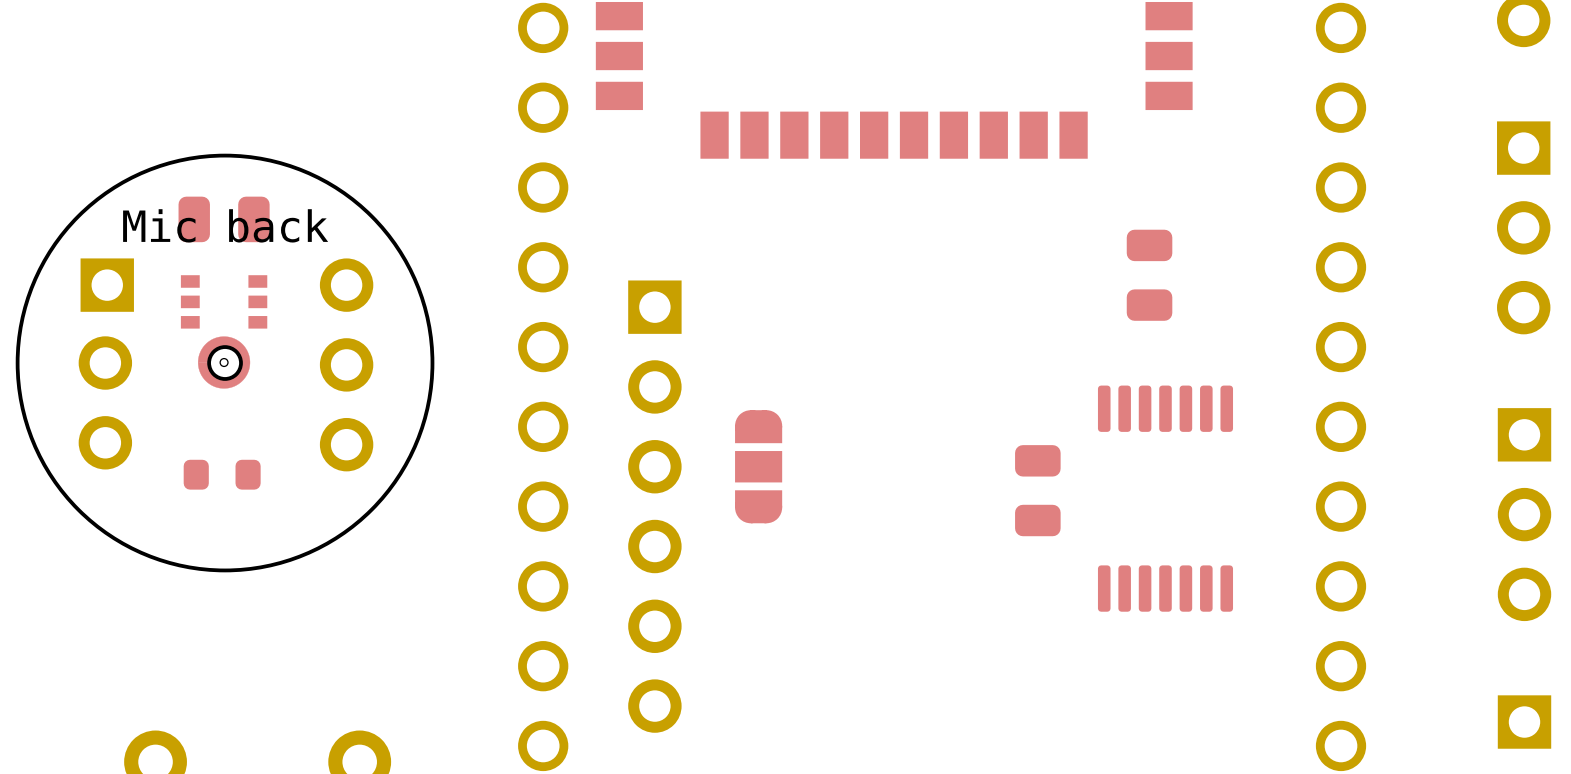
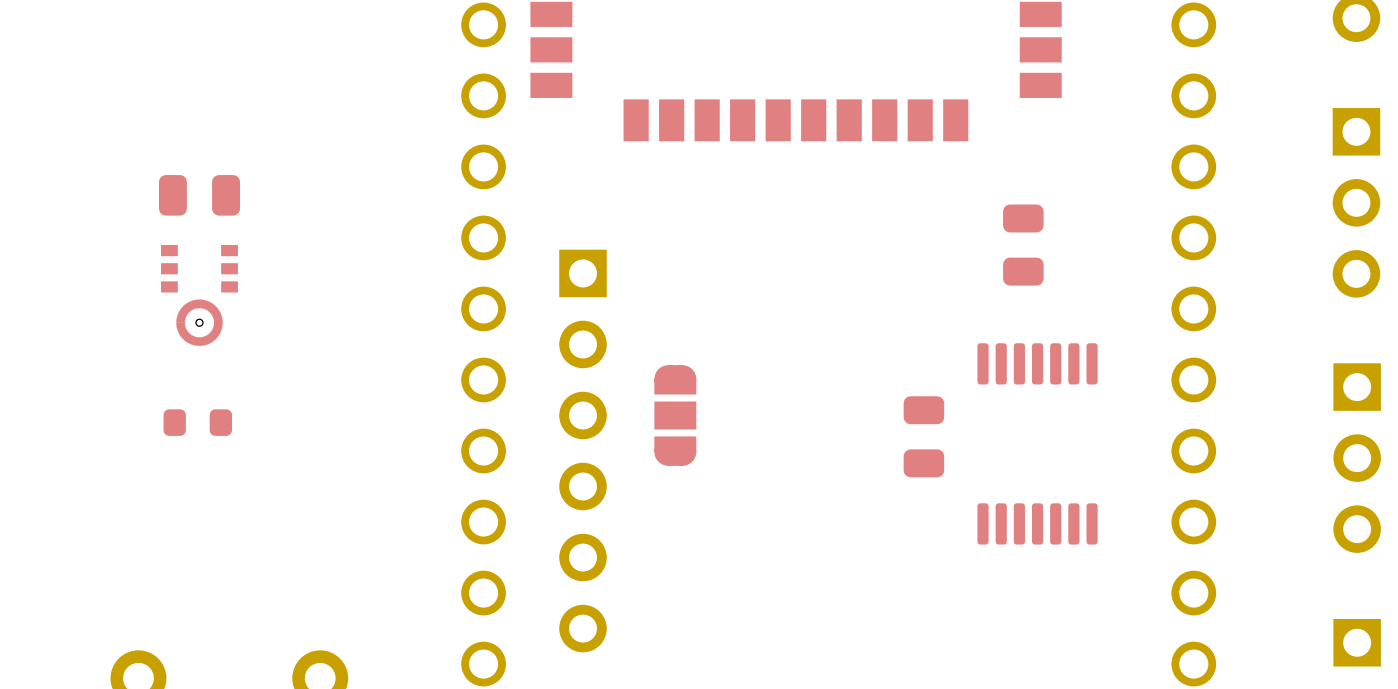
part: (225, 363) -> none

